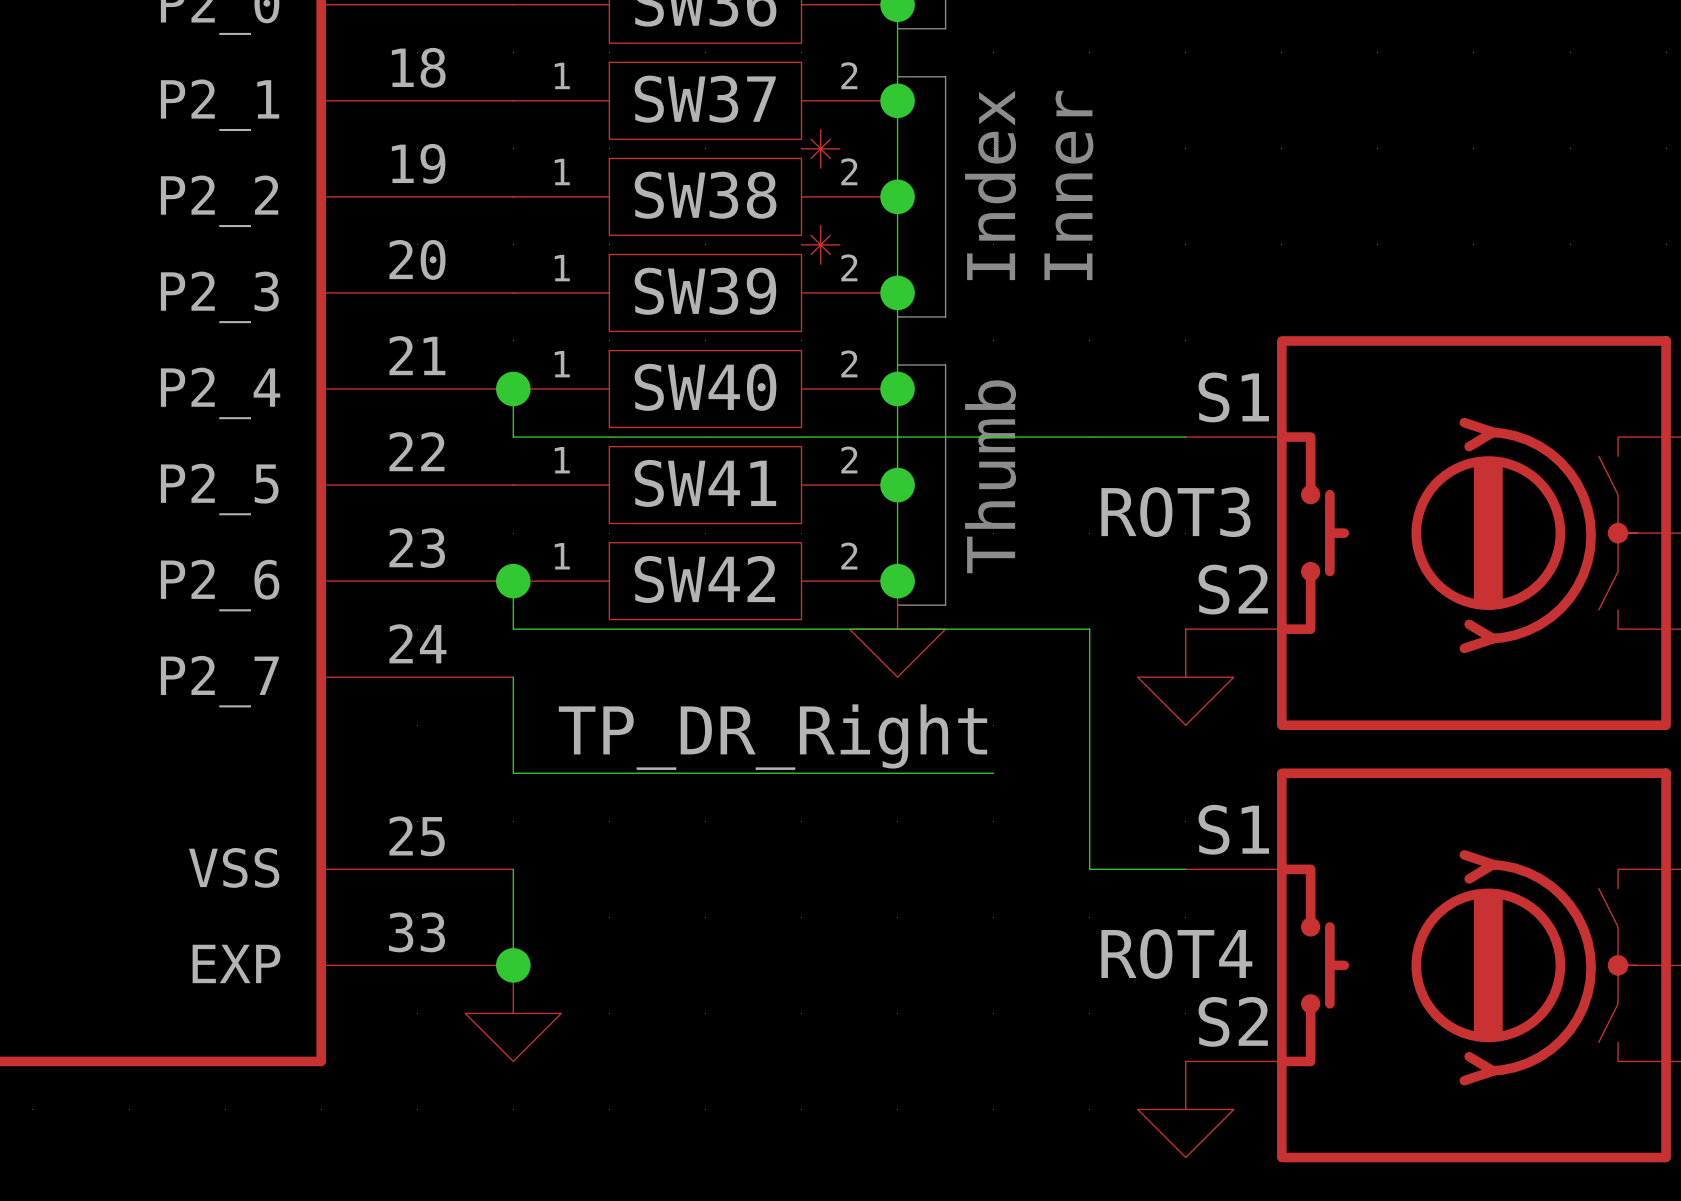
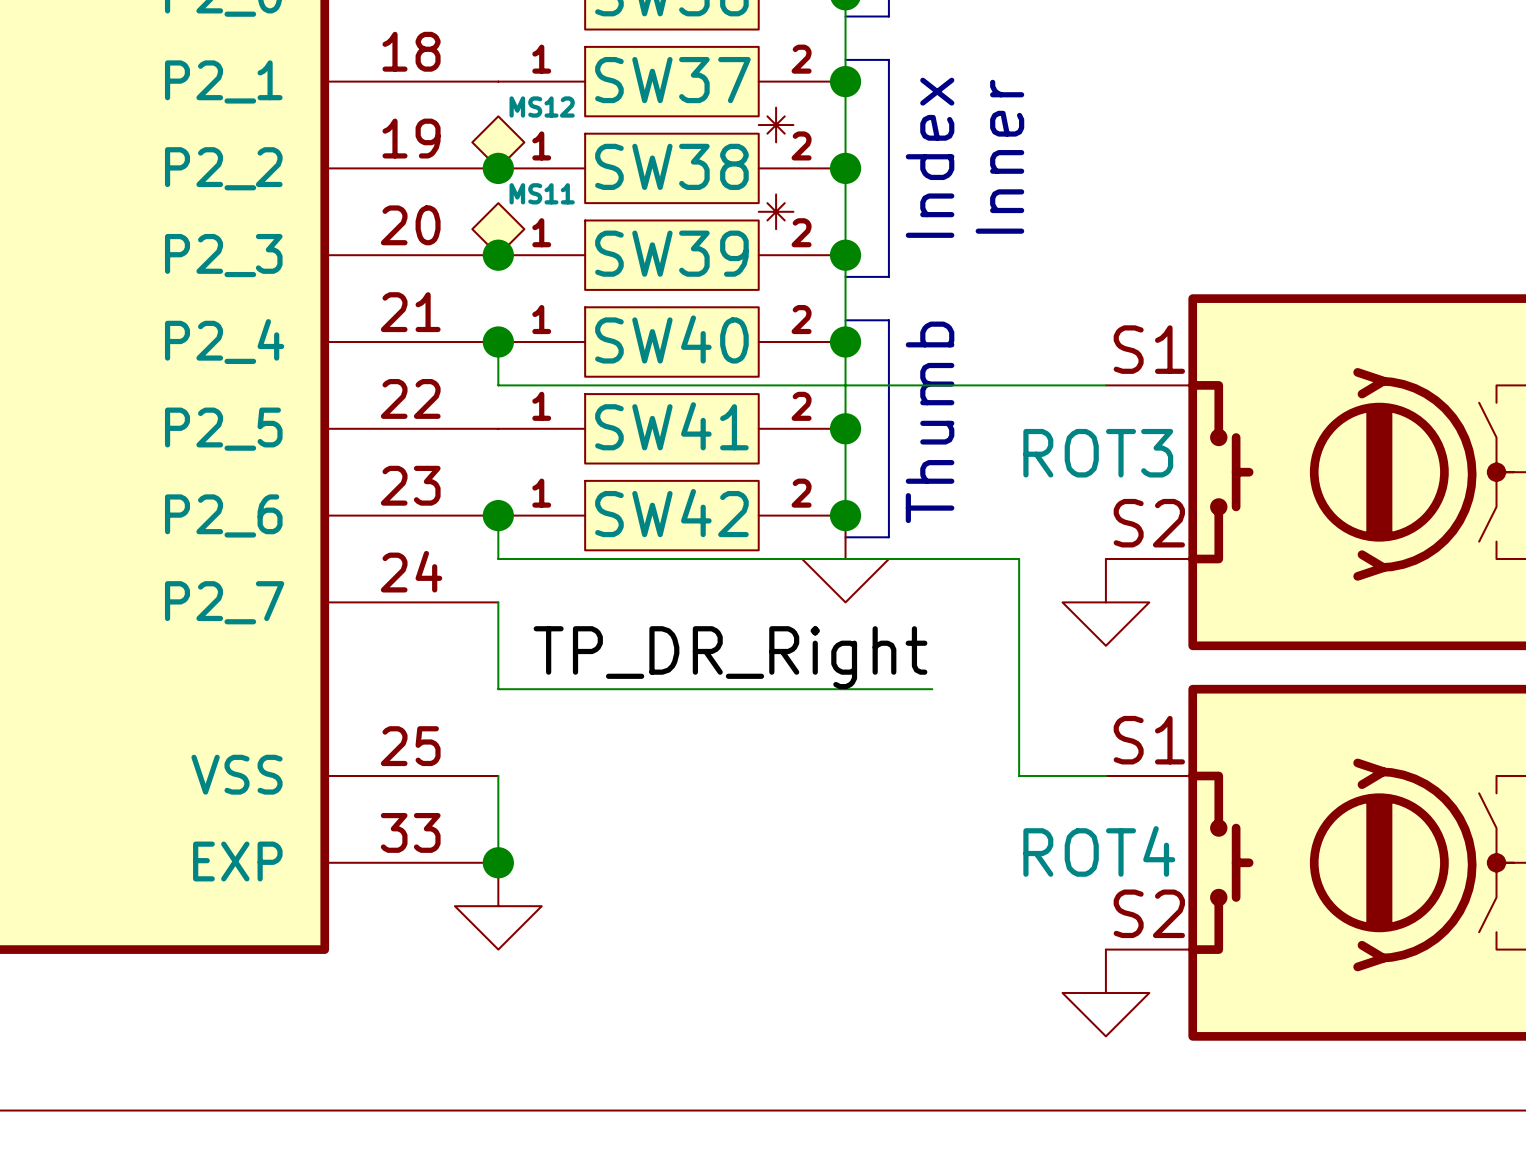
MS12: none -> (498, 142)
junction: none -> (498, 168)
MS11: none -> (498, 229)
junction: none -> (498, 255)

